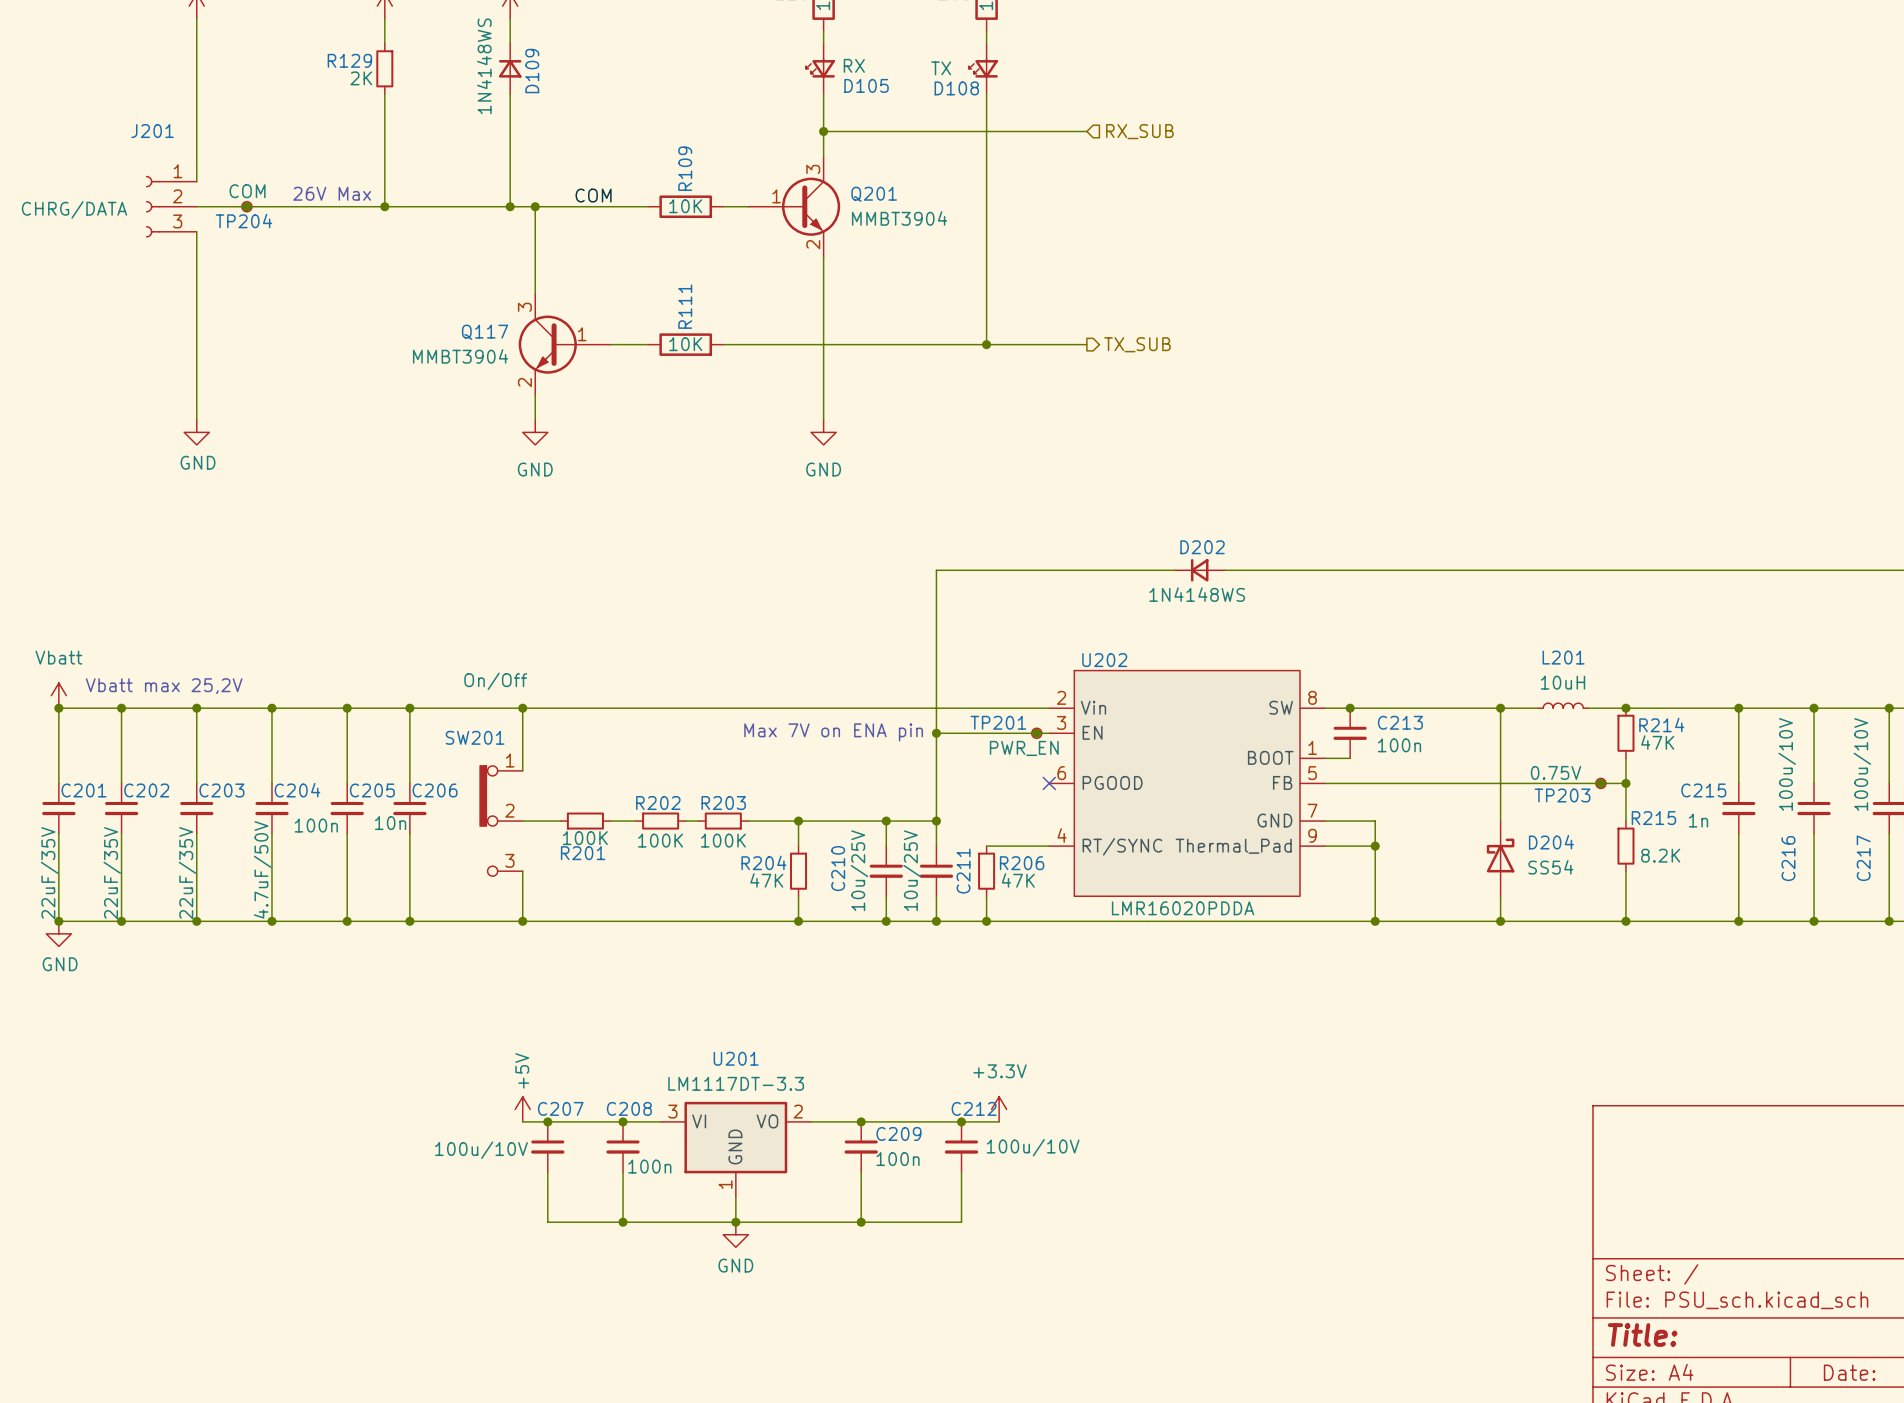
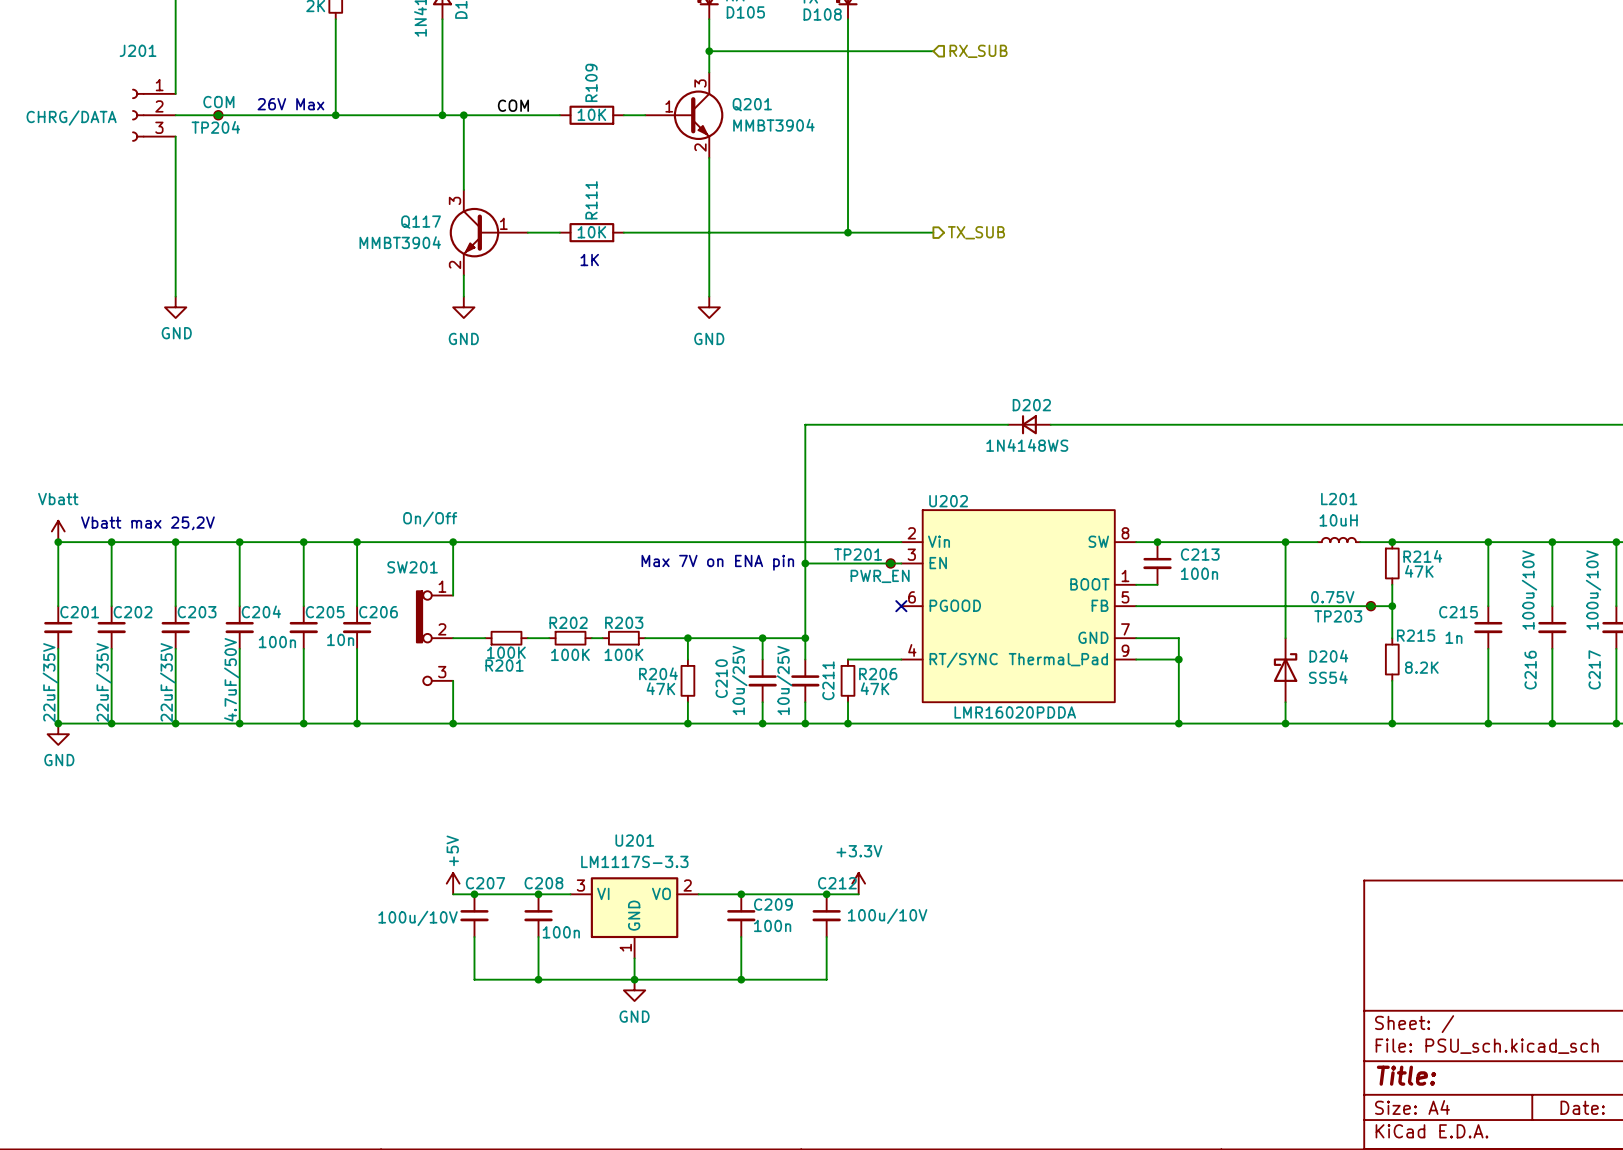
text: none -> 1K (589, 260)
U201 value: LM1117DT-3.3 (736, 1083) -> LM1117S-3.3 (634, 861)

